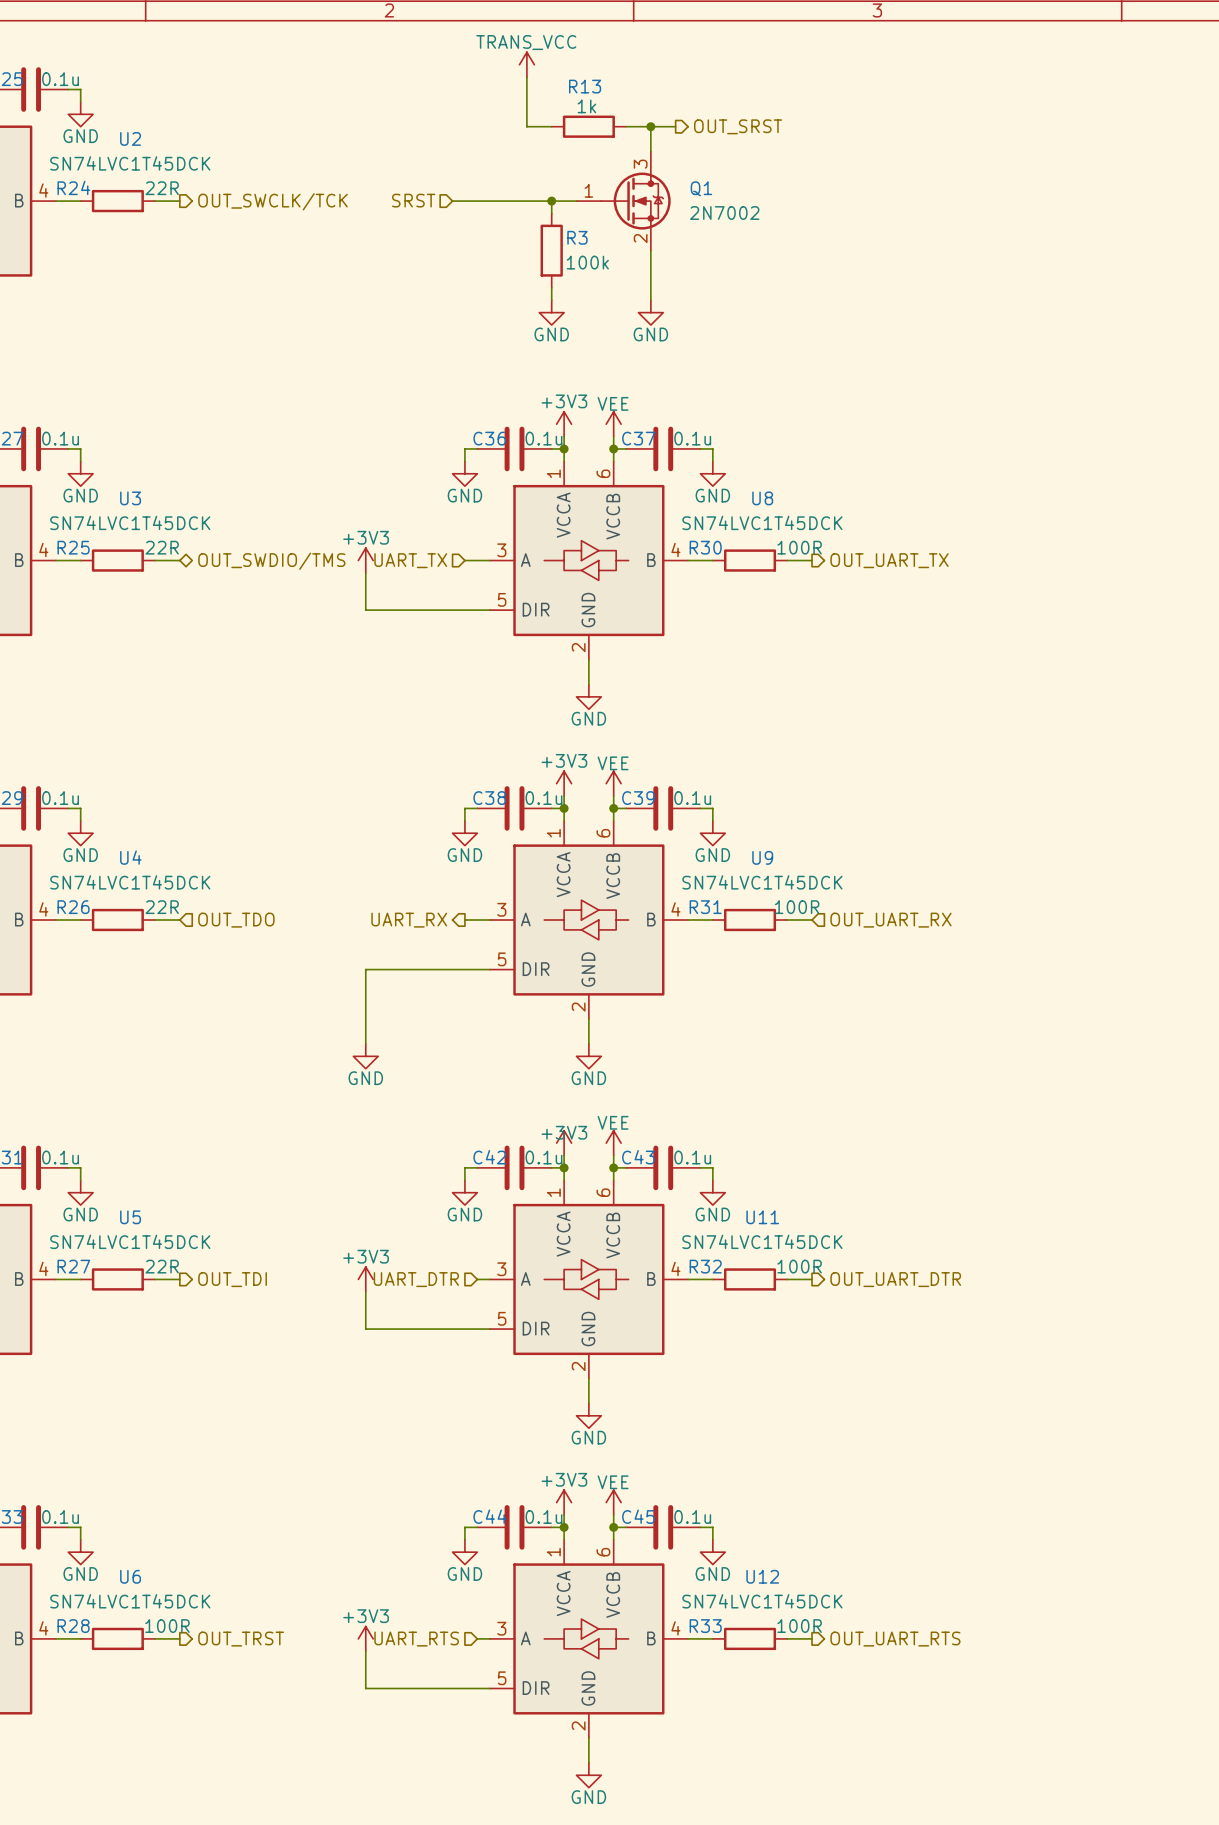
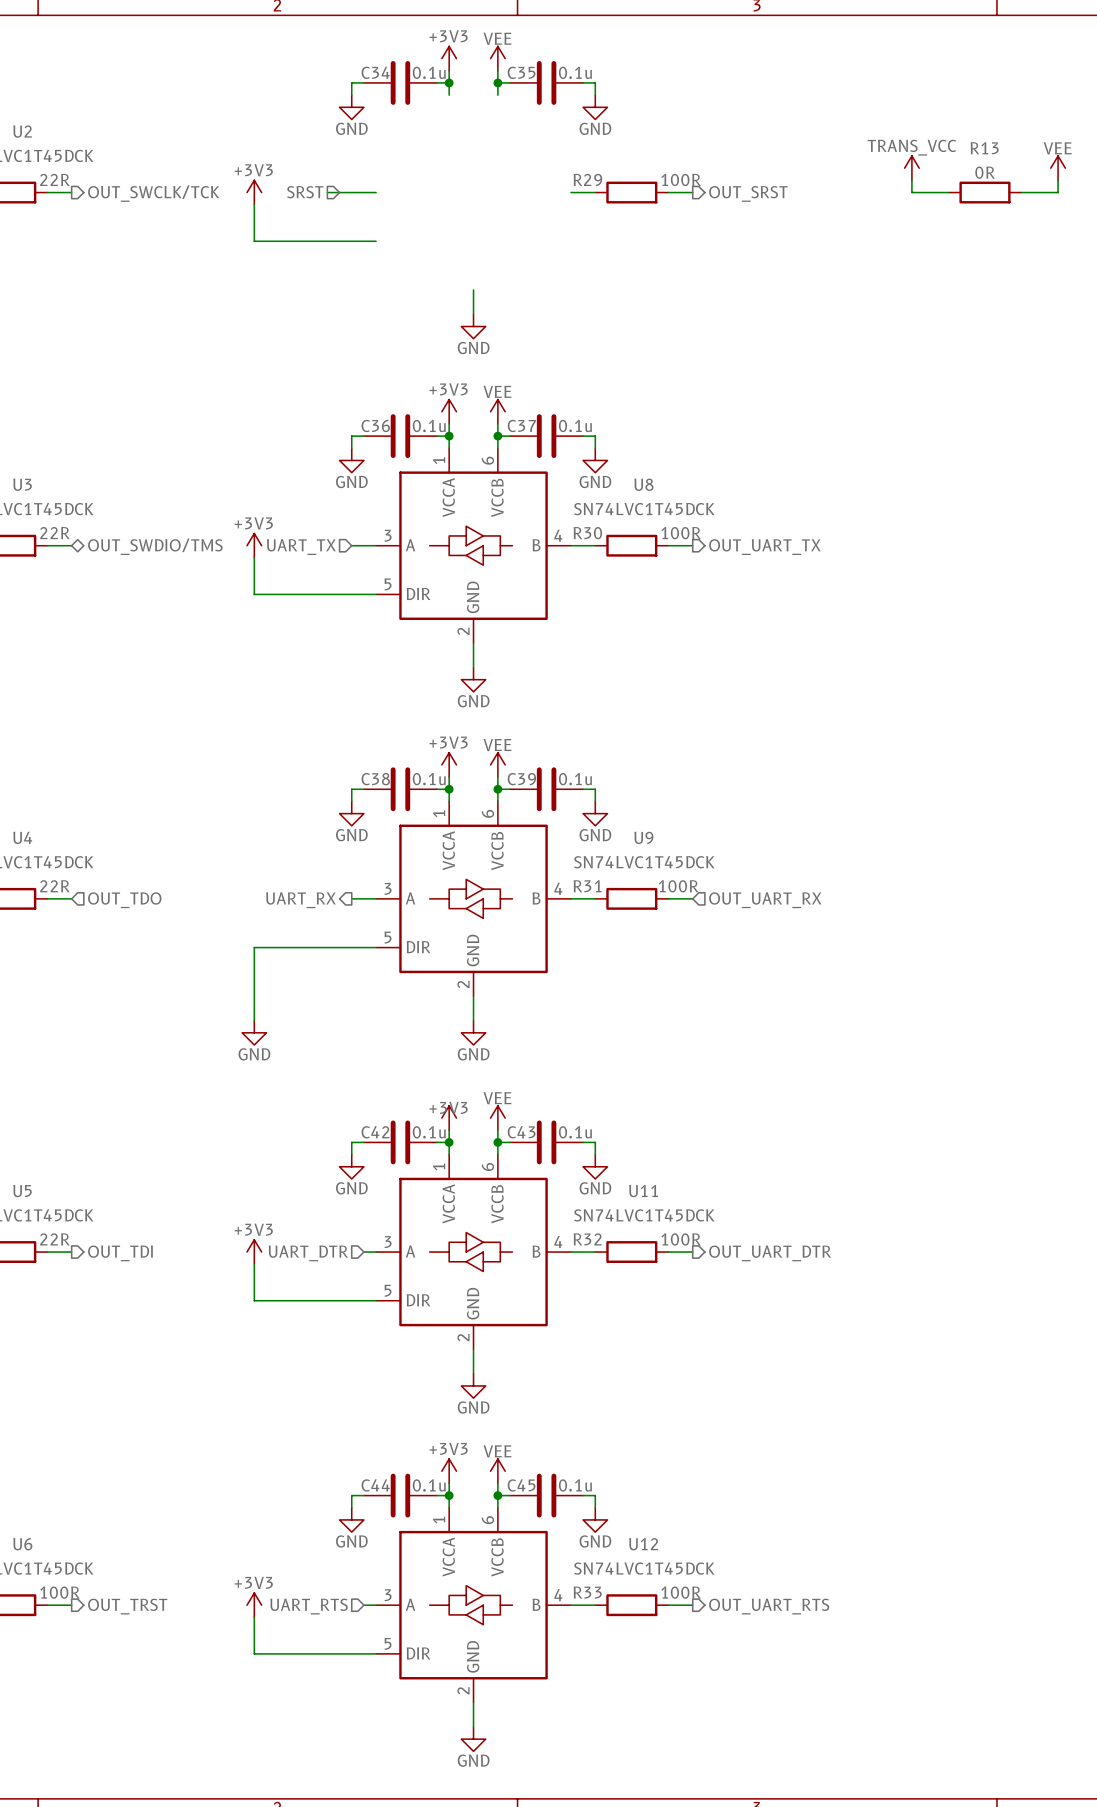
power symbol: TRANS_VCC (526, 64) -> none
power symbol: none -> +3V3 (449, 58)
power symbol: none -> VEE (497, 58)
wire: (526, 77) (526, 126) (551, 126) -> none
wire: none -> (449, 70) (449, 95)
R13 name position: R13 (585, 86) -> R13 (984, 148)
wire: none -> (363, 82) (351, 82) (351, 95)
C34: none -> 0.1u (400, 82)
wire: none -> (436, 82) (449, 82)
junction: none -> (449, 82)
wire: none -> (497, 82) (510, 82)
junction: none -> (497, 82)
C35: none -> 0.1u (546, 82)
wire: none -> (583, 82) (595, 82) (595, 95)
R13 value: 1k (586, 106) -> 0R (985, 172)
power symbol: none -> GND (351, 107)
power symbol: none -> GND (595, 107)
R13 position: (588, 126) -> (984, 192)
wire: (626, 126) (675, 126) -> none
wire: (650, 126) (650, 151) -> (497, 70) (497, 95)
junction: (650, 126) -> none
hierarchical label position: OUT_SRST (738, 126) -> OUT_SRST (748, 193)
power symbol: none -> TRANS_VCC (911, 168)
power symbol: none -> VEE (1058, 168)
wire: none -> (911, 180) (911, 192) (948, 192)
wire: none -> (1058, 180) (1058, 192) (1021, 192)
power symbol: none -> +3V3 (254, 192)
wire: none -> (327, 192) (339, 192)
wire: (489, 201) (576, 201) -> none
wire: (551, 201) (551, 213) -> none
junction: (551, 201) -> none
Q1: 2N7002 (623, 201) -> none
wire: none -> (570, 192) (595, 192)
R29: none -> 100R (631, 192)
wire: none -> (668, 192) (692, 192)
wire: none -> (254, 204) (254, 241) (376, 241)
R3: 100k (551, 250) -> none
wire: (650, 250) (650, 300) -> none
wire: (551, 287) (551, 300) -> none
wire: none -> (473, 289) (473, 314)
power symbol: GND (551, 312) -> none
power symbol: GND (650, 312) -> none
power symbol: none -> GND (473, 326)

